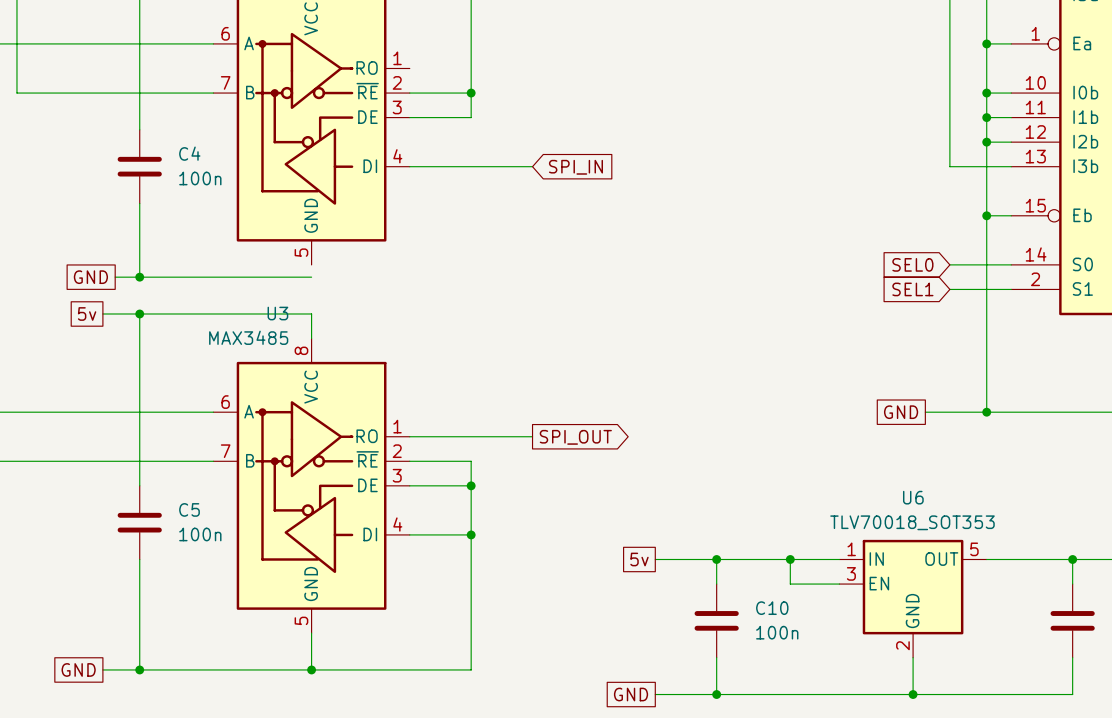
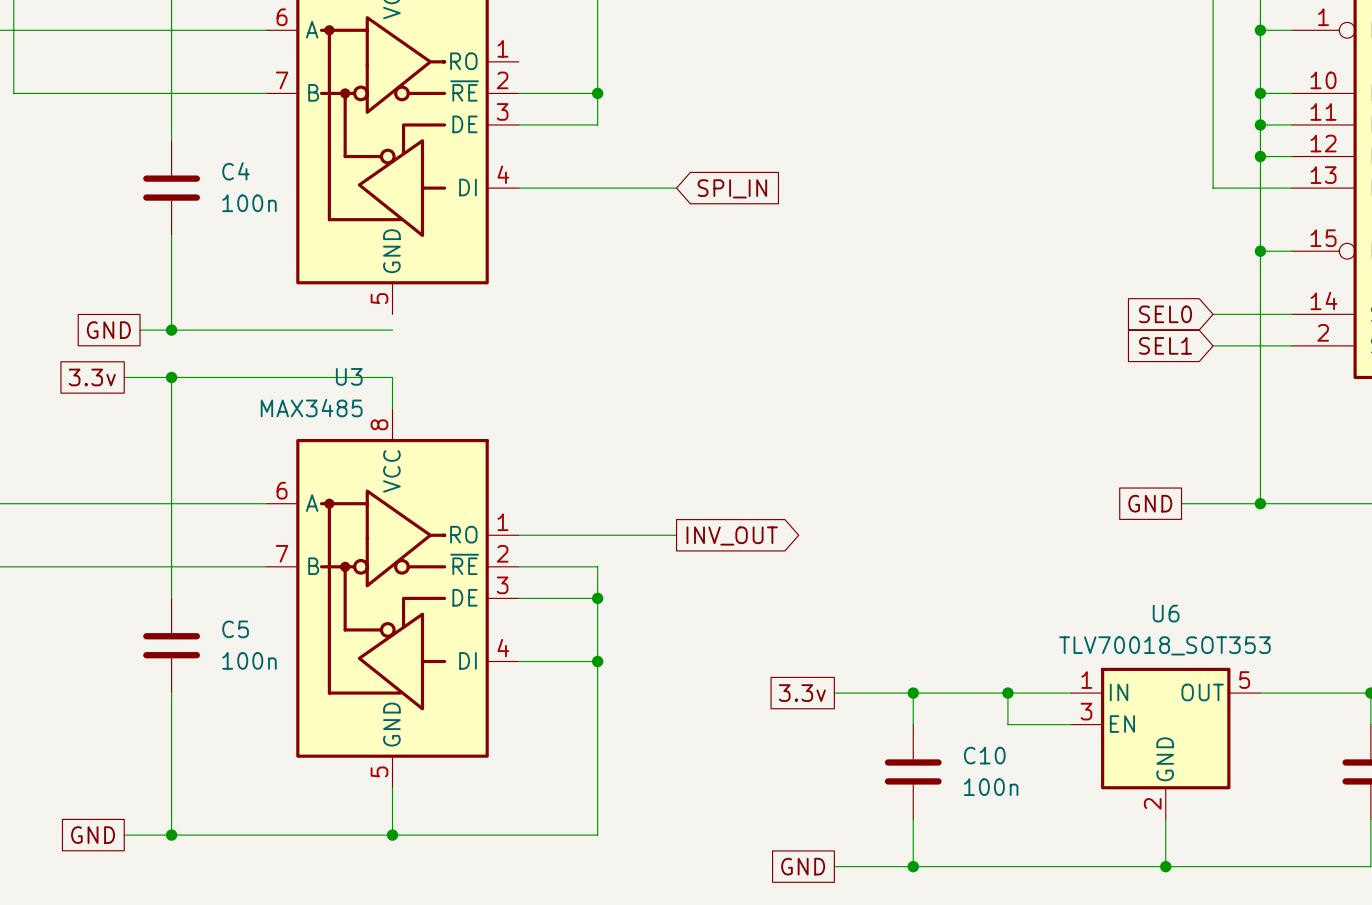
global label: 5v (87, 313) -> 3.3v (92, 377)
global label: SPI_OUT (575, 437) -> INV_OUT (732, 536)
global label: 5v (639, 559) -> 3.3v (802, 693)

